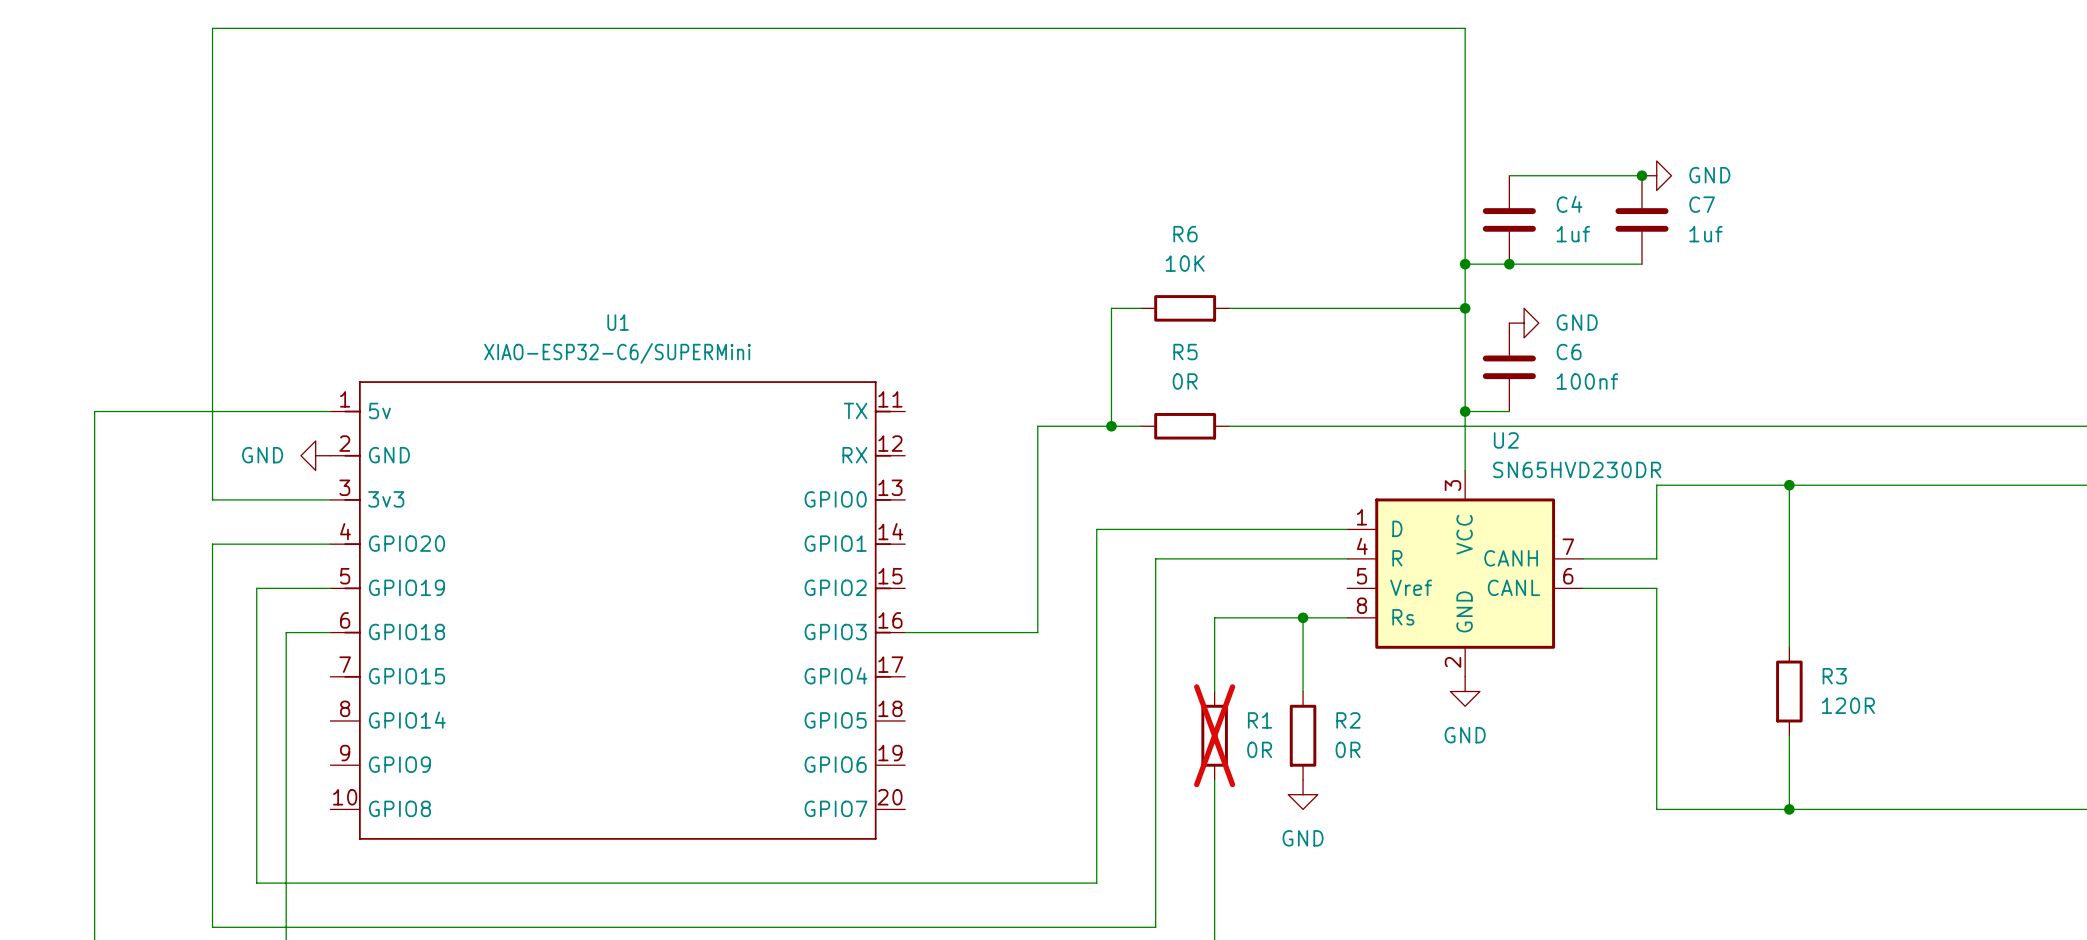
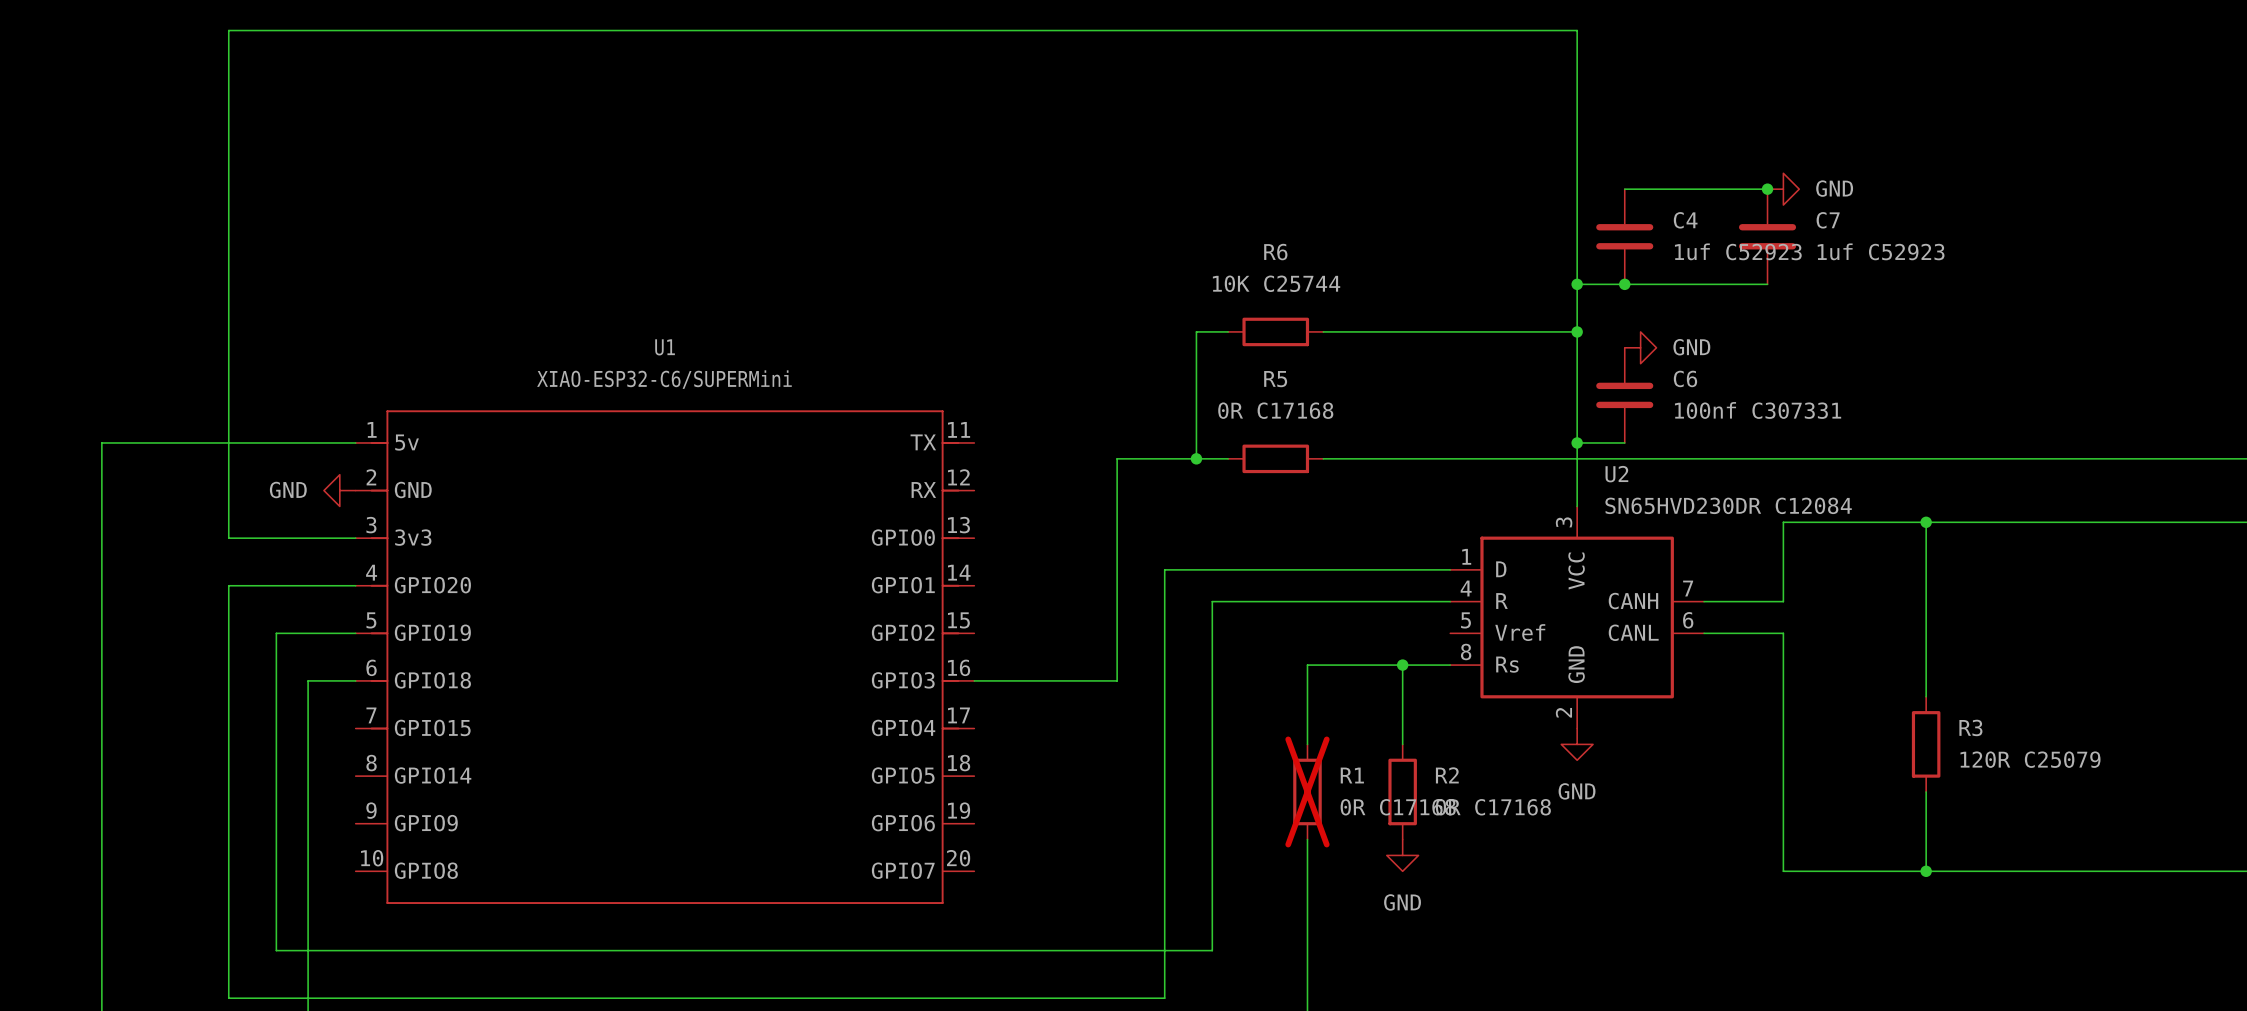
C4 value: 1uf (1573, 234) -> 1uf C52923 (1738, 251)
C7 value: 1uf (1705, 234) -> 1uf C52923 (1881, 251)
R6 value: 10K (1185, 263) -> 10K C25744 (1276, 283)
R5 value: 0R (1185, 381) -> 0R C17168 (1275, 410)
C6 value: 100nf (1587, 381) -> 100nf C307331 (1758, 410)
U2 value: SN65HVD230DR (1577, 469) -> SN65HVD230DR C12084 (1728, 505)
wire: (1096, 529) (1096, 883) -> (1180, 569) (1164, 569) (1164, 998)
wire: (1155, 558) (1155, 927) (1081, 927) -> (1244, 601) (1212, 601) (1212, 950) (1180, 950)
R3 value: 120R (1848, 705) -> 120R C25079 (2030, 759)
R1 value: 0R (1259, 749) -> 0R C17168 (1398, 807)
R2 value: 0R (1348, 749) -> 0R C17168 (1493, 807)

